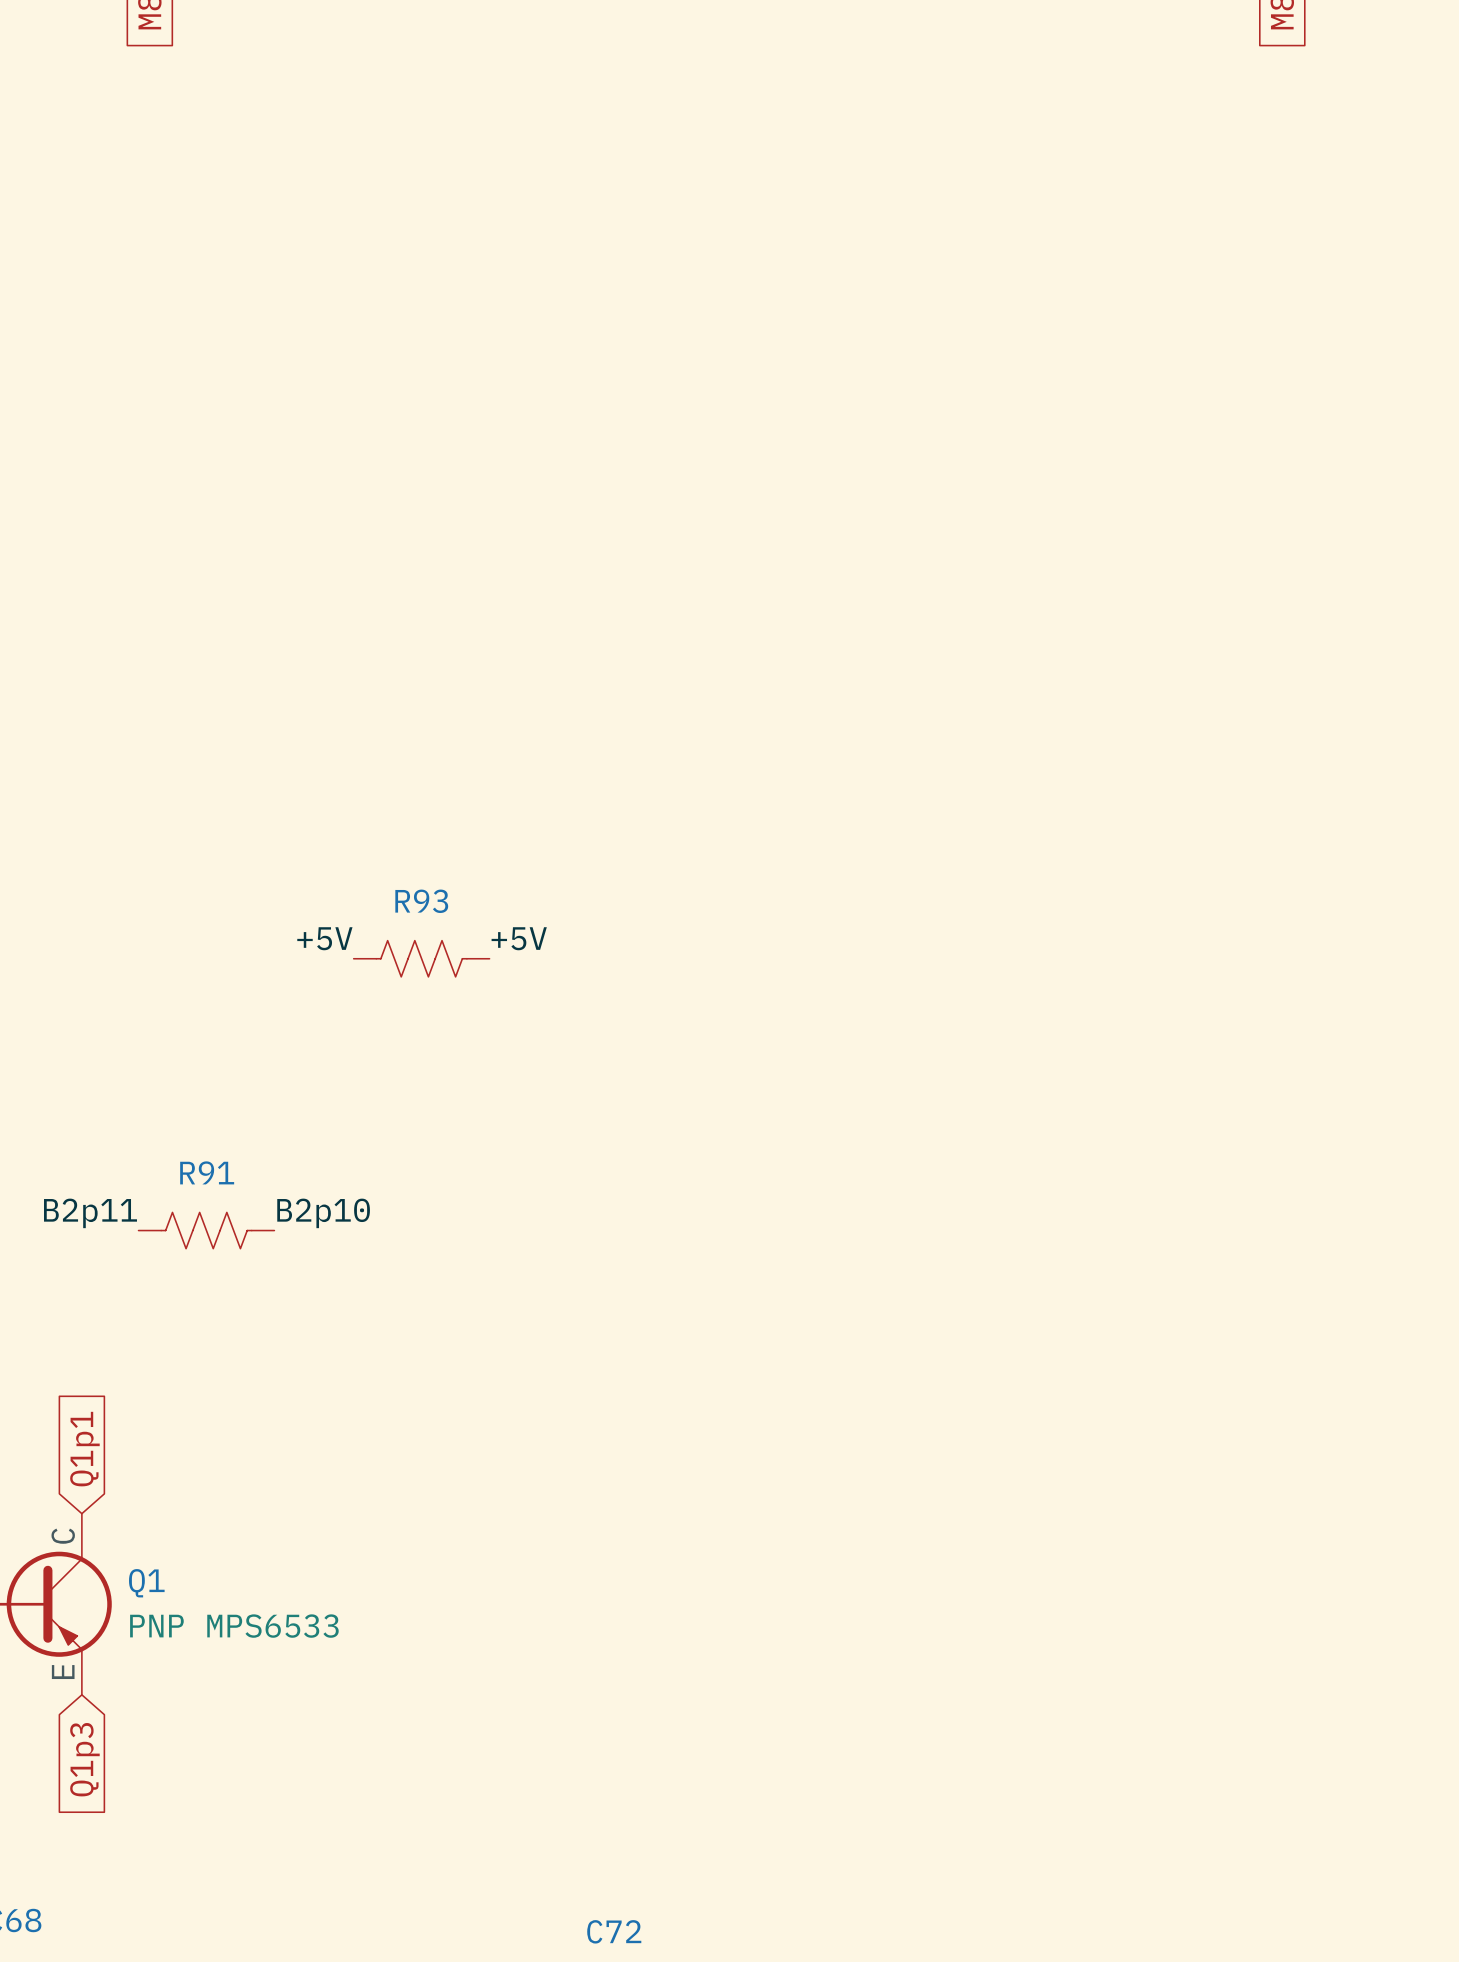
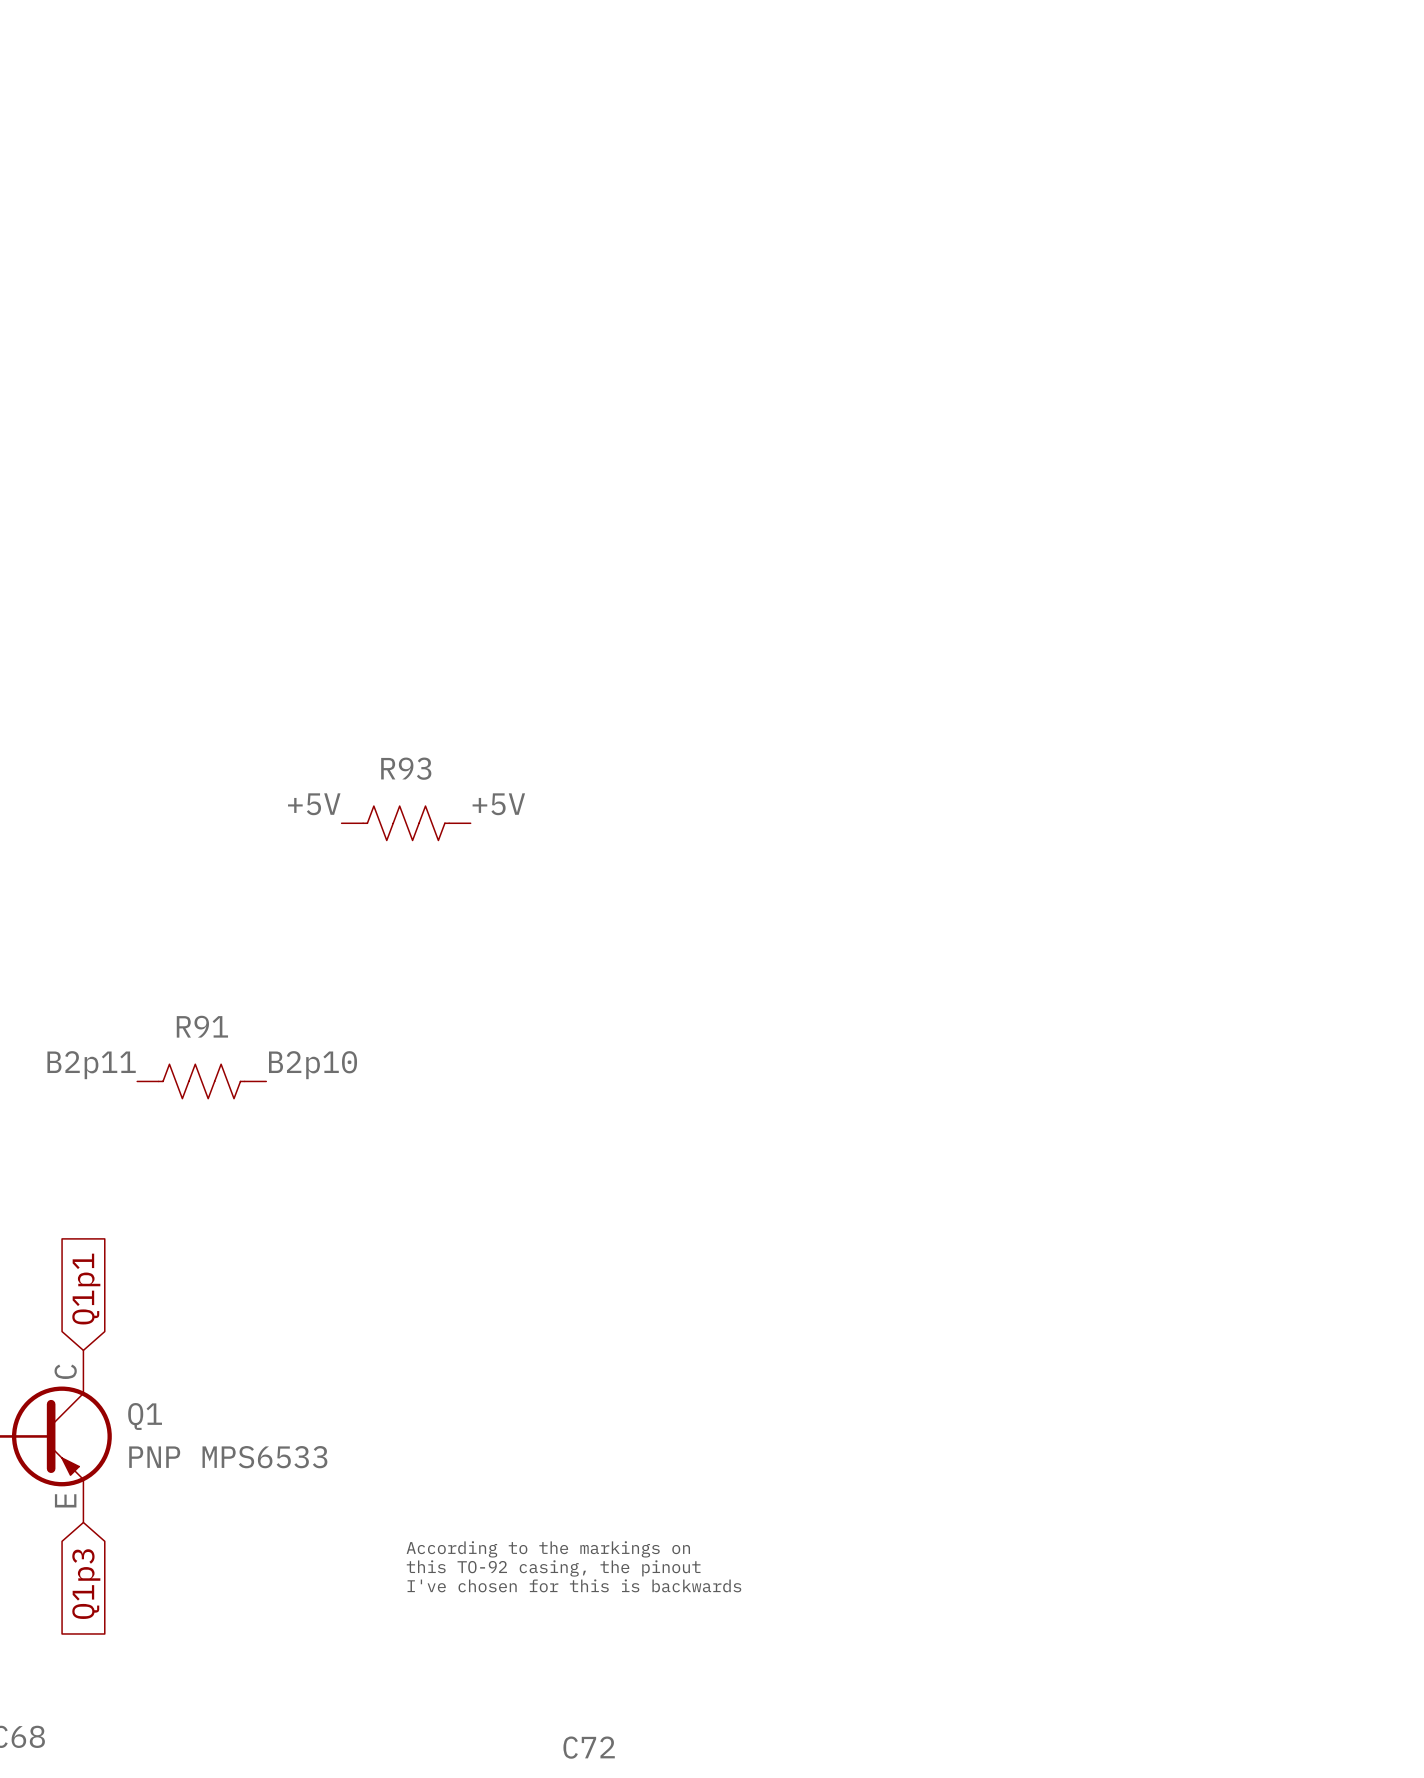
text: none -> According to the markings on (548, 1549)
text: none -> this TO-92 casing, the pinout (553, 1568)
text: none -> I've chosen for this is backwards (574, 1585)

